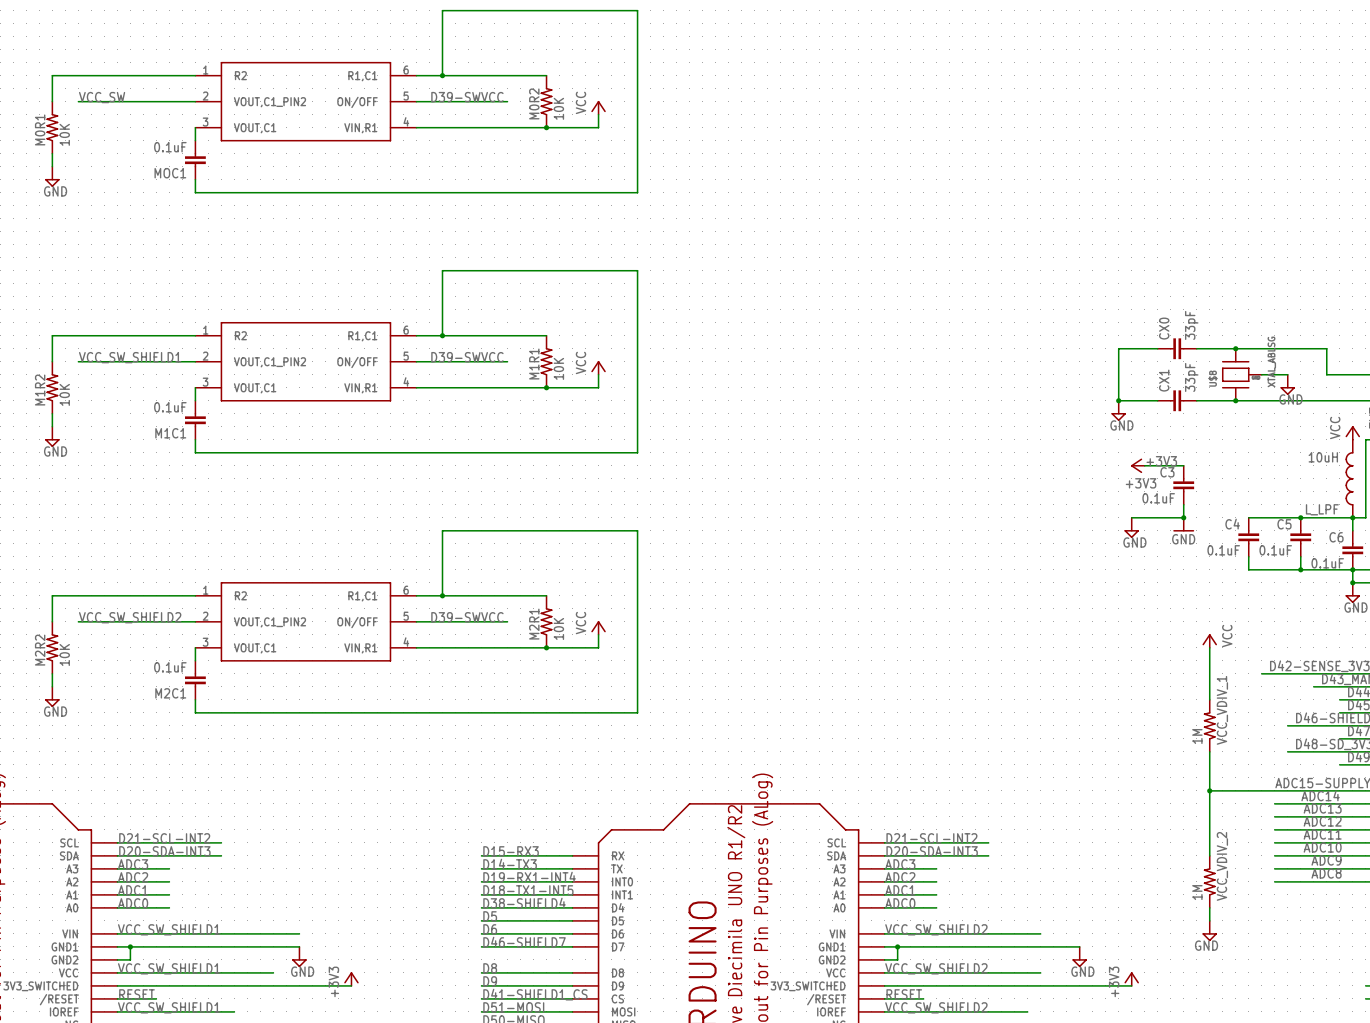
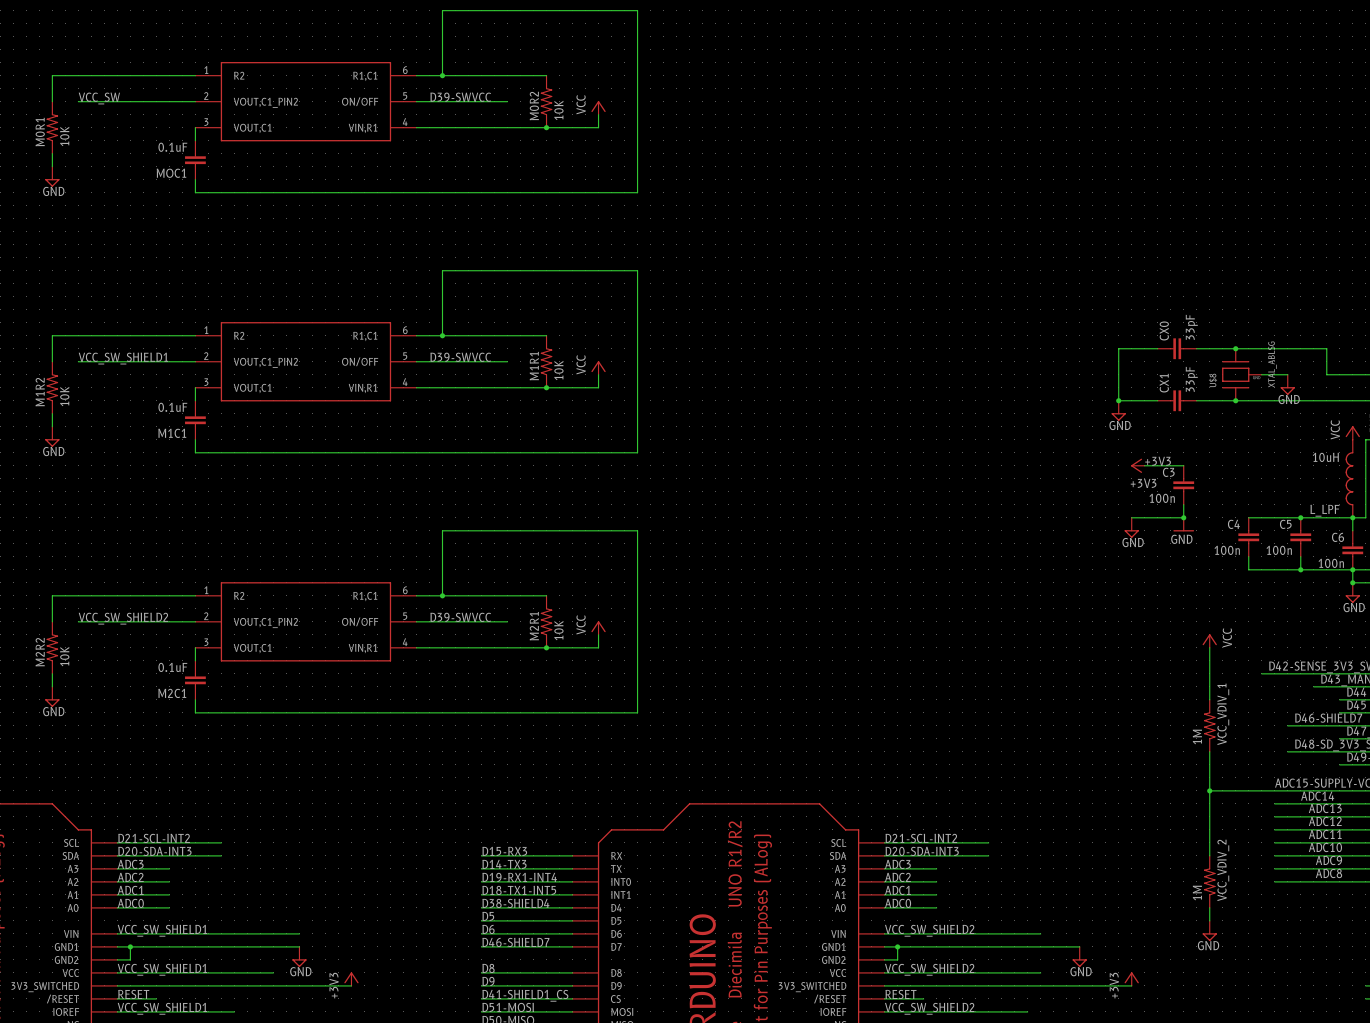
C3 value: 0.1uF (1158, 498) -> 100n (1162, 498)
C4 value: 0.1uF (1223, 550) -> 100n (1227, 550)
C5 value: 0.1uF (1275, 550) -> 100n (1279, 550)
C6 value: 0.1uF (1327, 563) -> 100n (1331, 563)

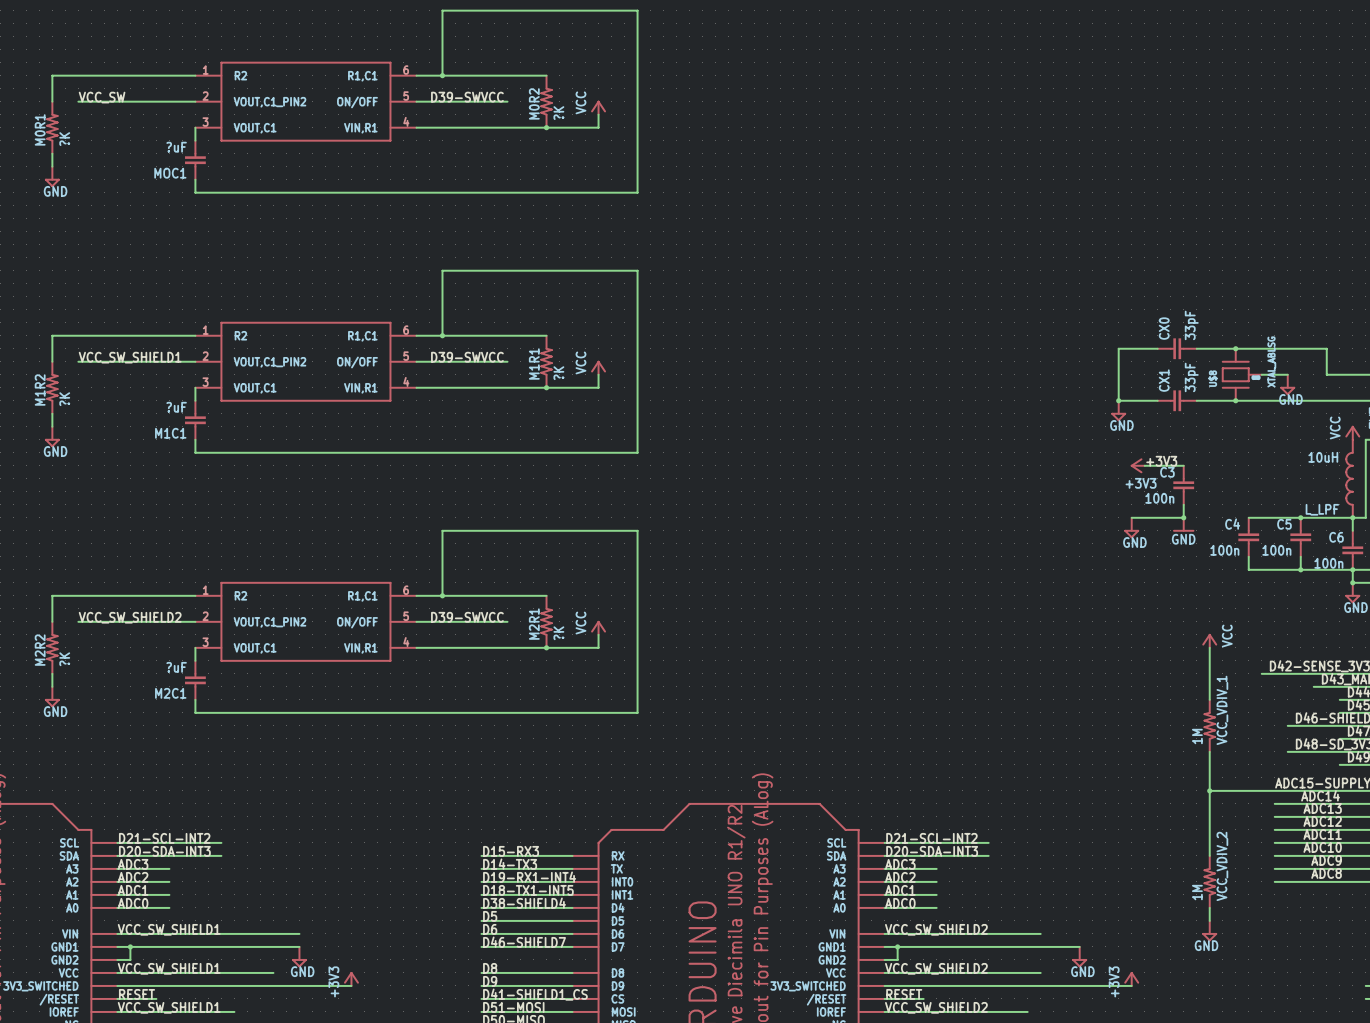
M0R2 value: 10K (558, 110) -> ?K (558, 113)
M0R1 value: 10K (64, 136) -> ?K (64, 139)
MOC1 value: 0.1uF (172, 147) -> ?uF (176, 147)
M1R1 value: 10K (558, 370) -> ?K (558, 373)
M1R2 value: 10K (64, 396) -> ?K (64, 399)
M1C1 value: 0.1uF (172, 407) -> ?uF (176, 407)
M2R1 value: 10K (558, 630) -> ?K (558, 633)
M2R2 value: 10K (64, 656) -> ?K (64, 659)
M2C1 value: 0.1uF (172, 667) -> ?uF (176, 667)

